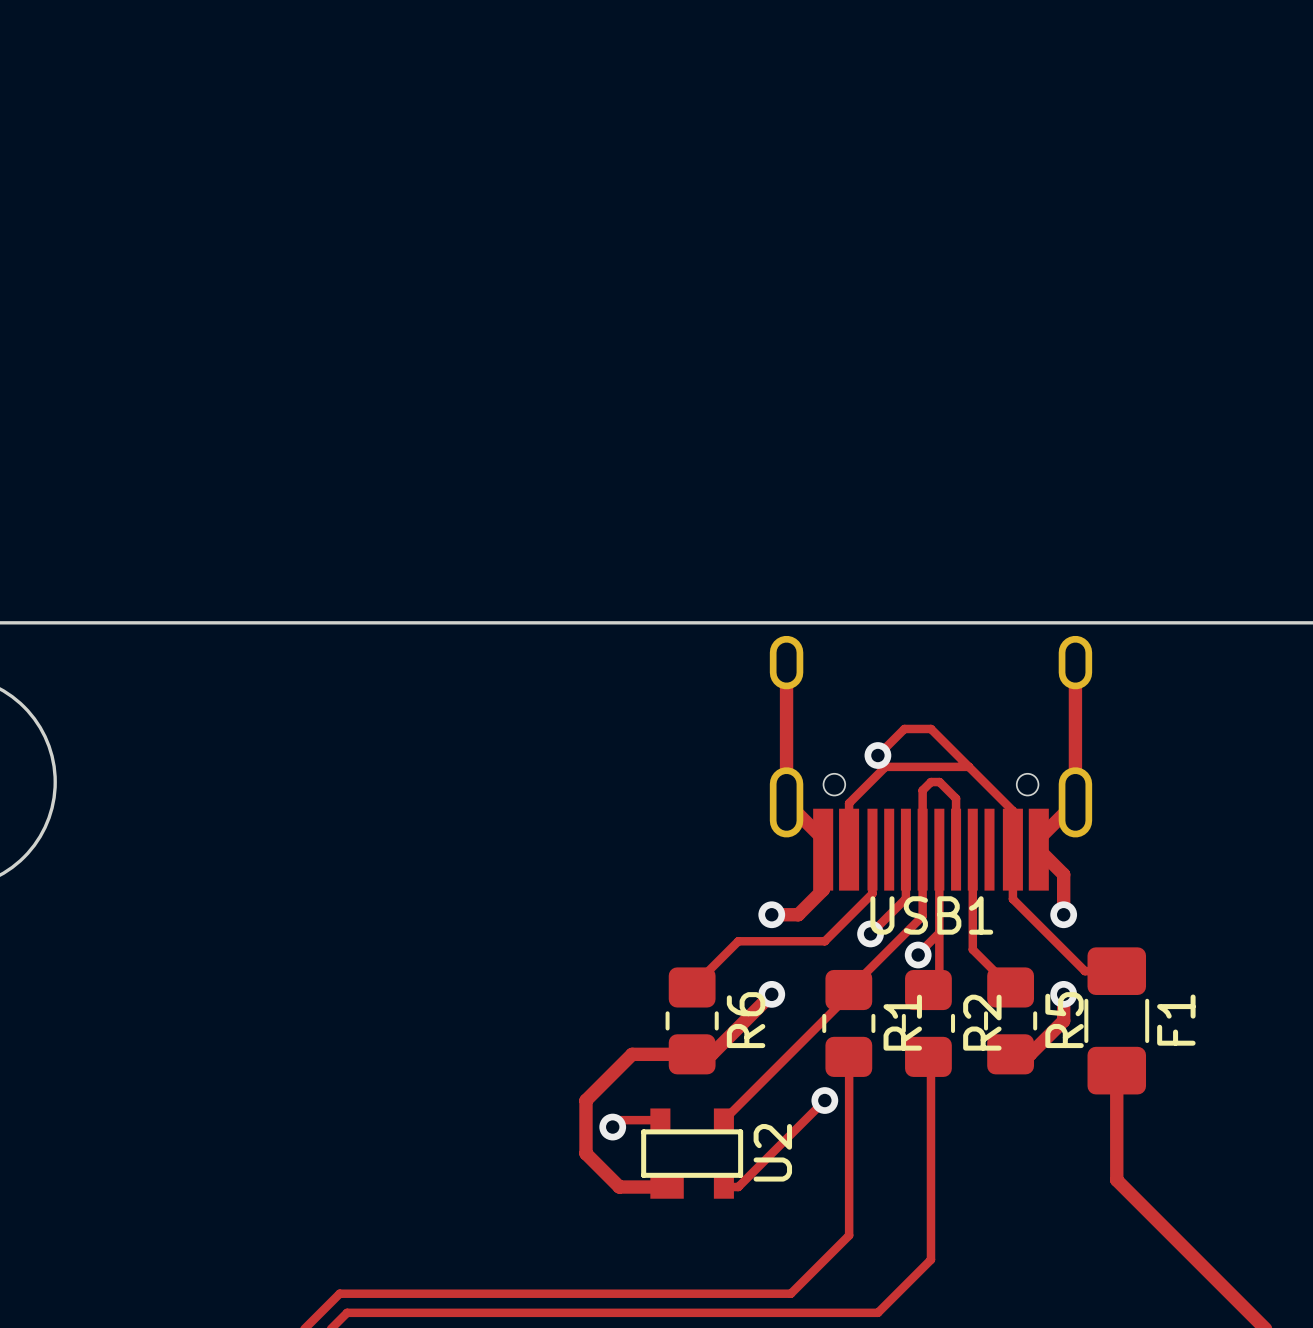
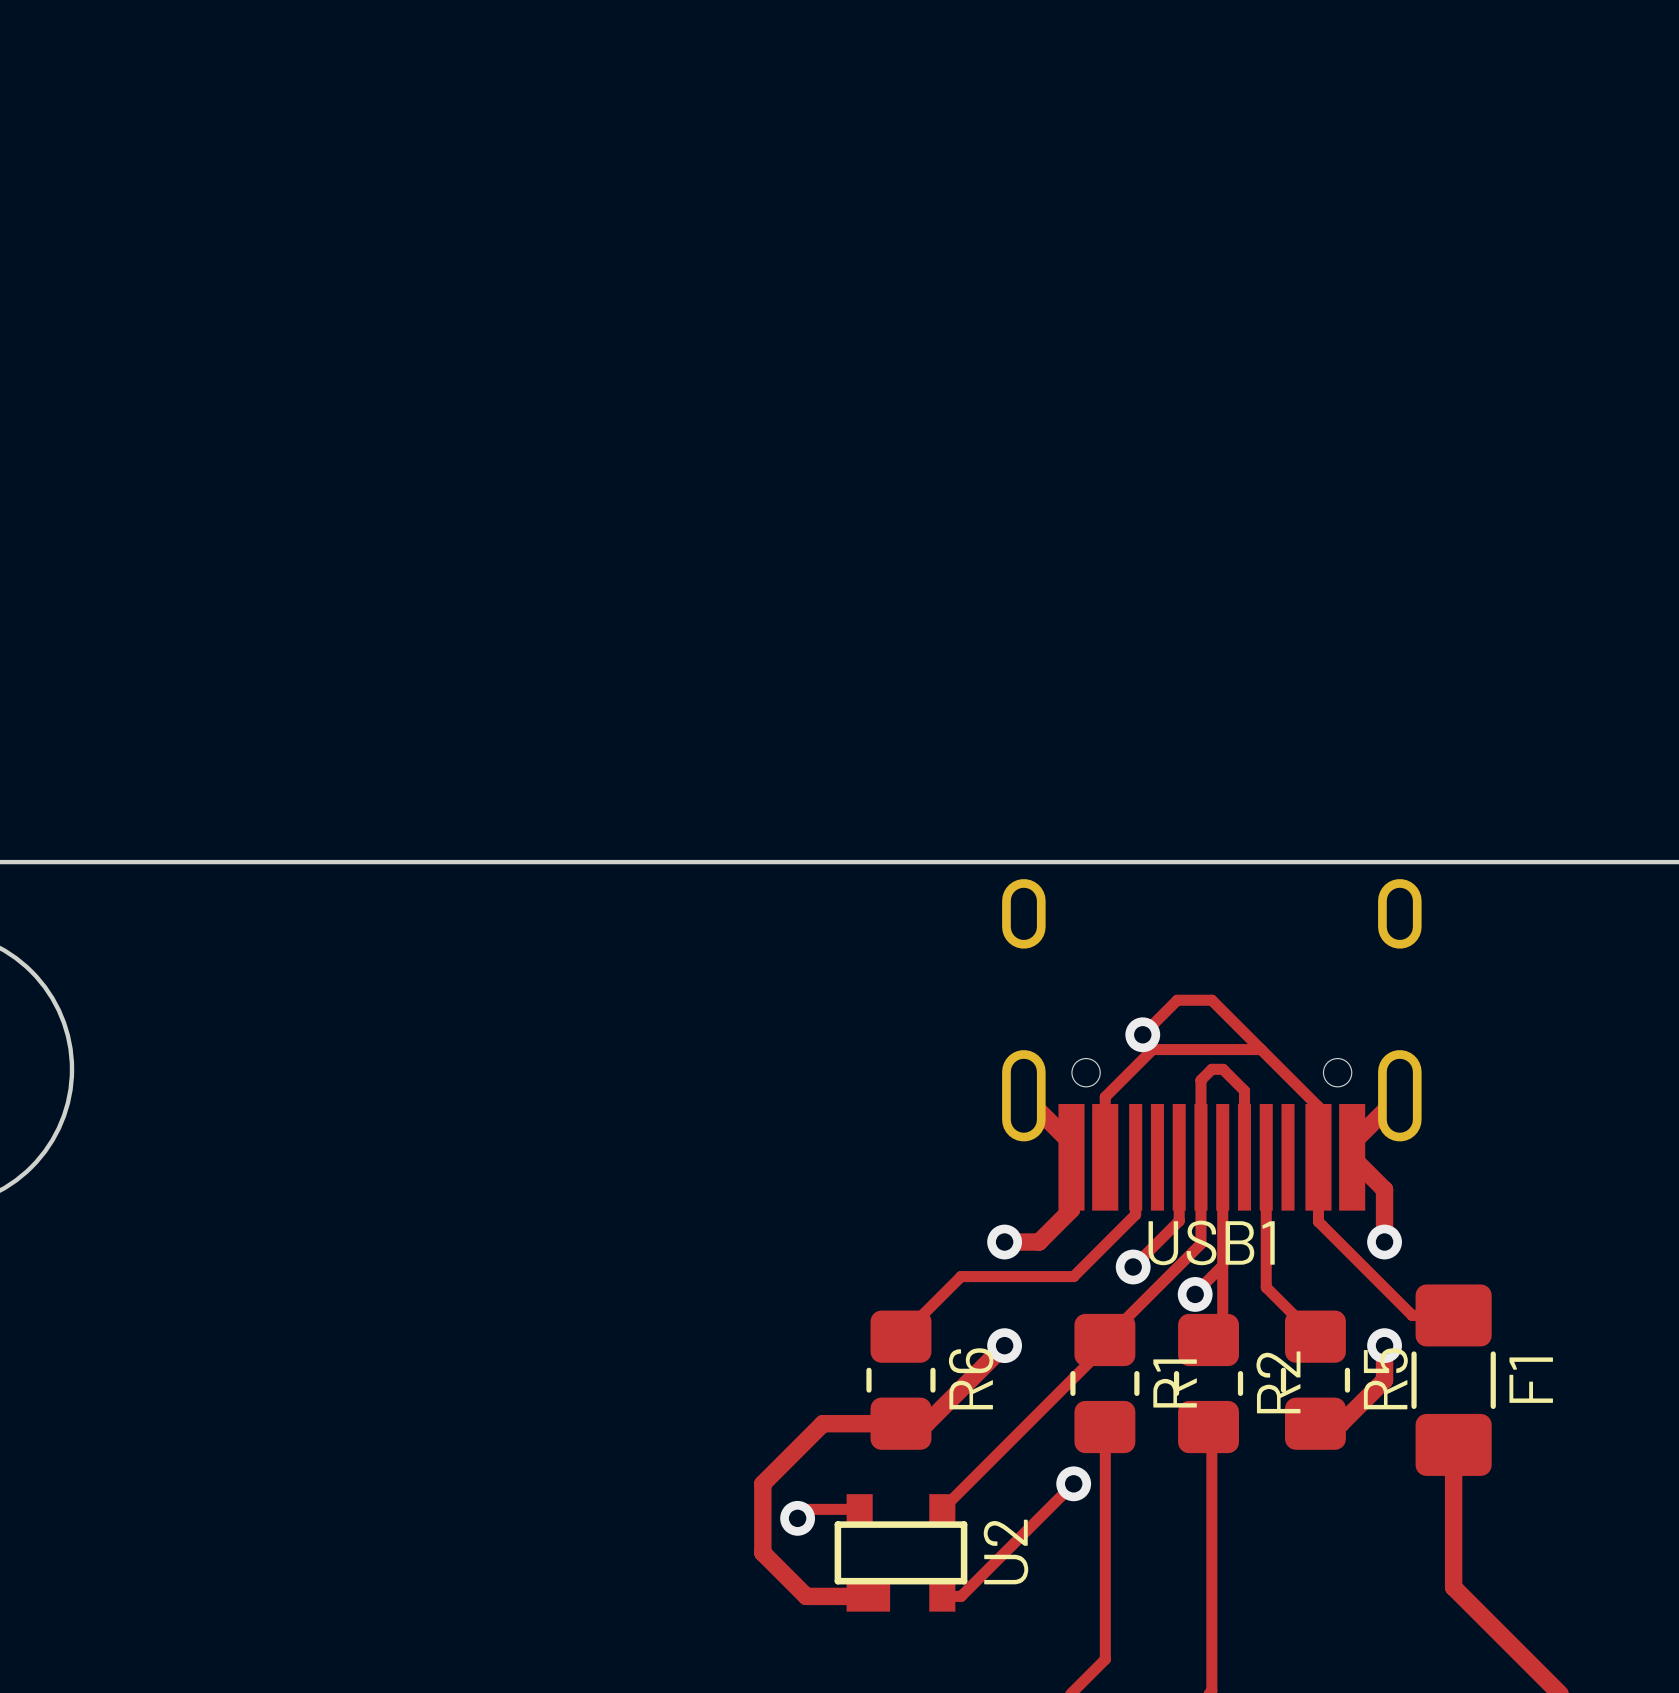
track: (786, 662) (786, 802) -> none
track: (1075, 662) (1075, 802) -> none

